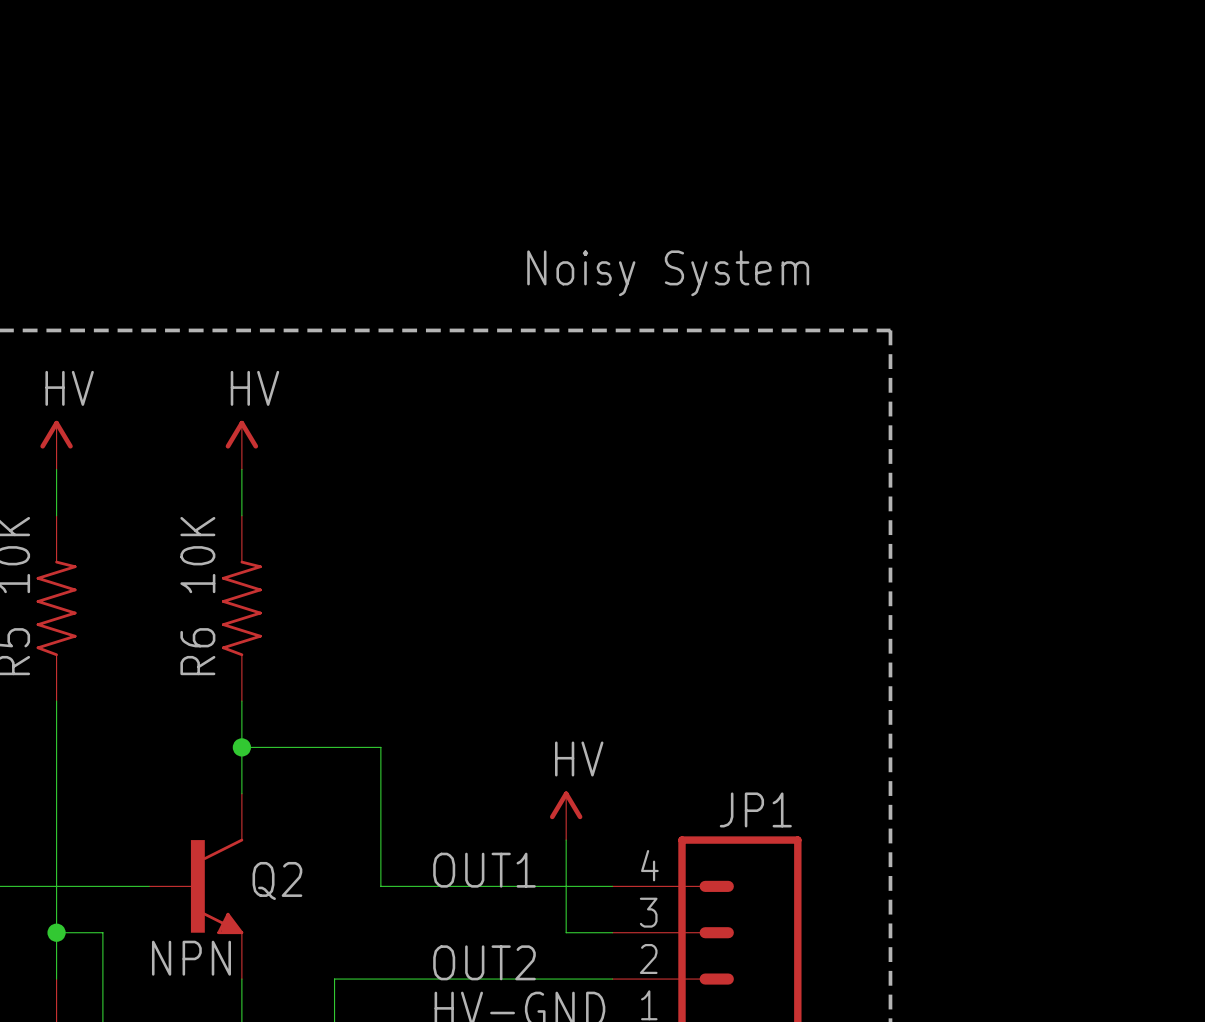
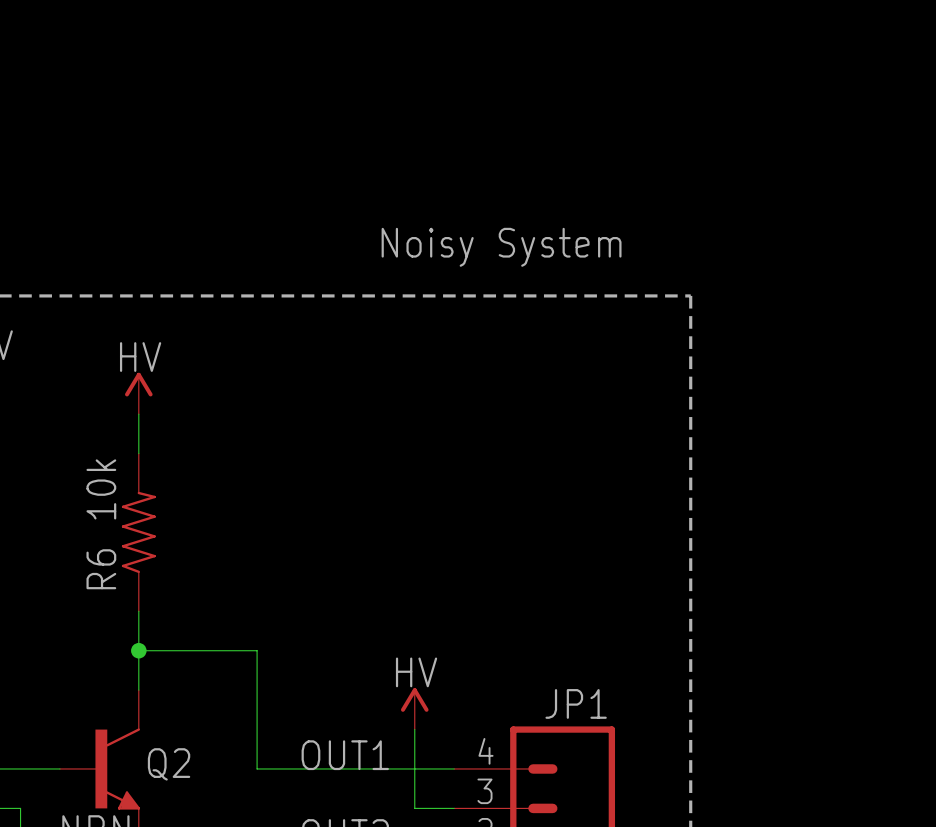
power symbol text position: HV (254, 388) -> HV (140, 357)
R6 value: 10K (197, 555) -> 10k (101, 489)
power symbol text position: HV (579, 758) -> HV (416, 672)

